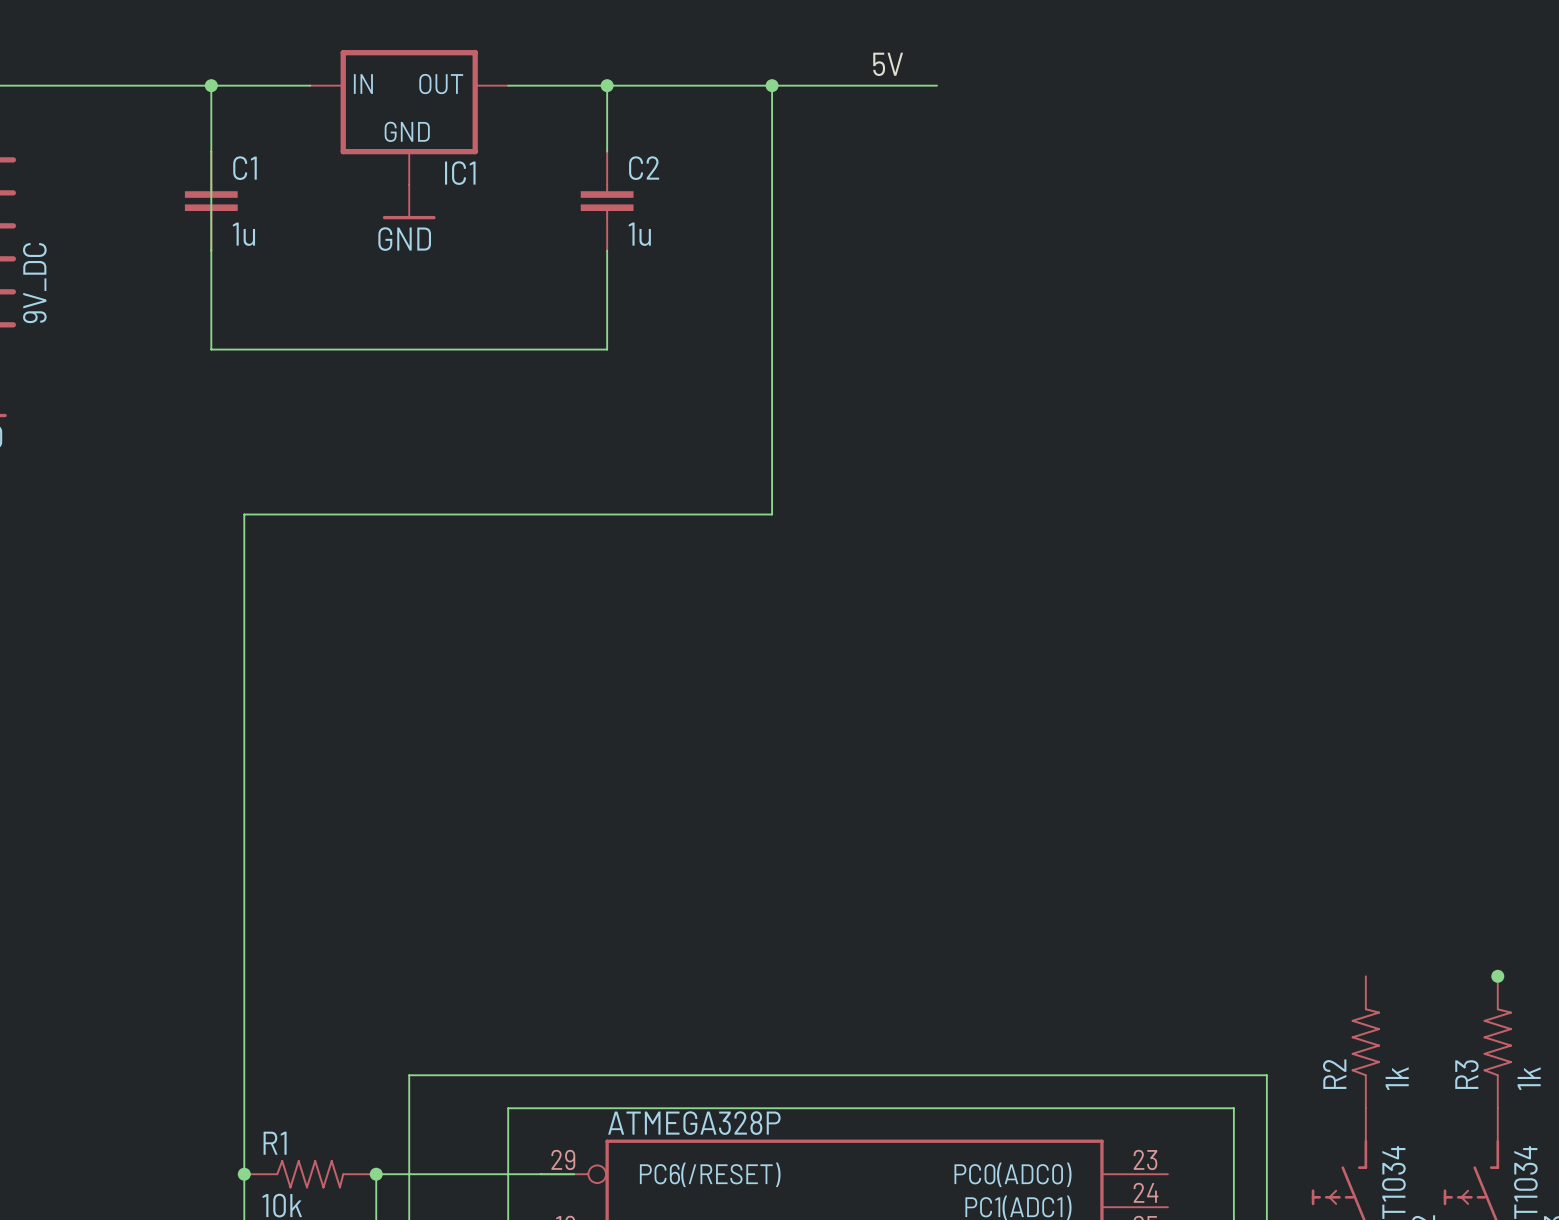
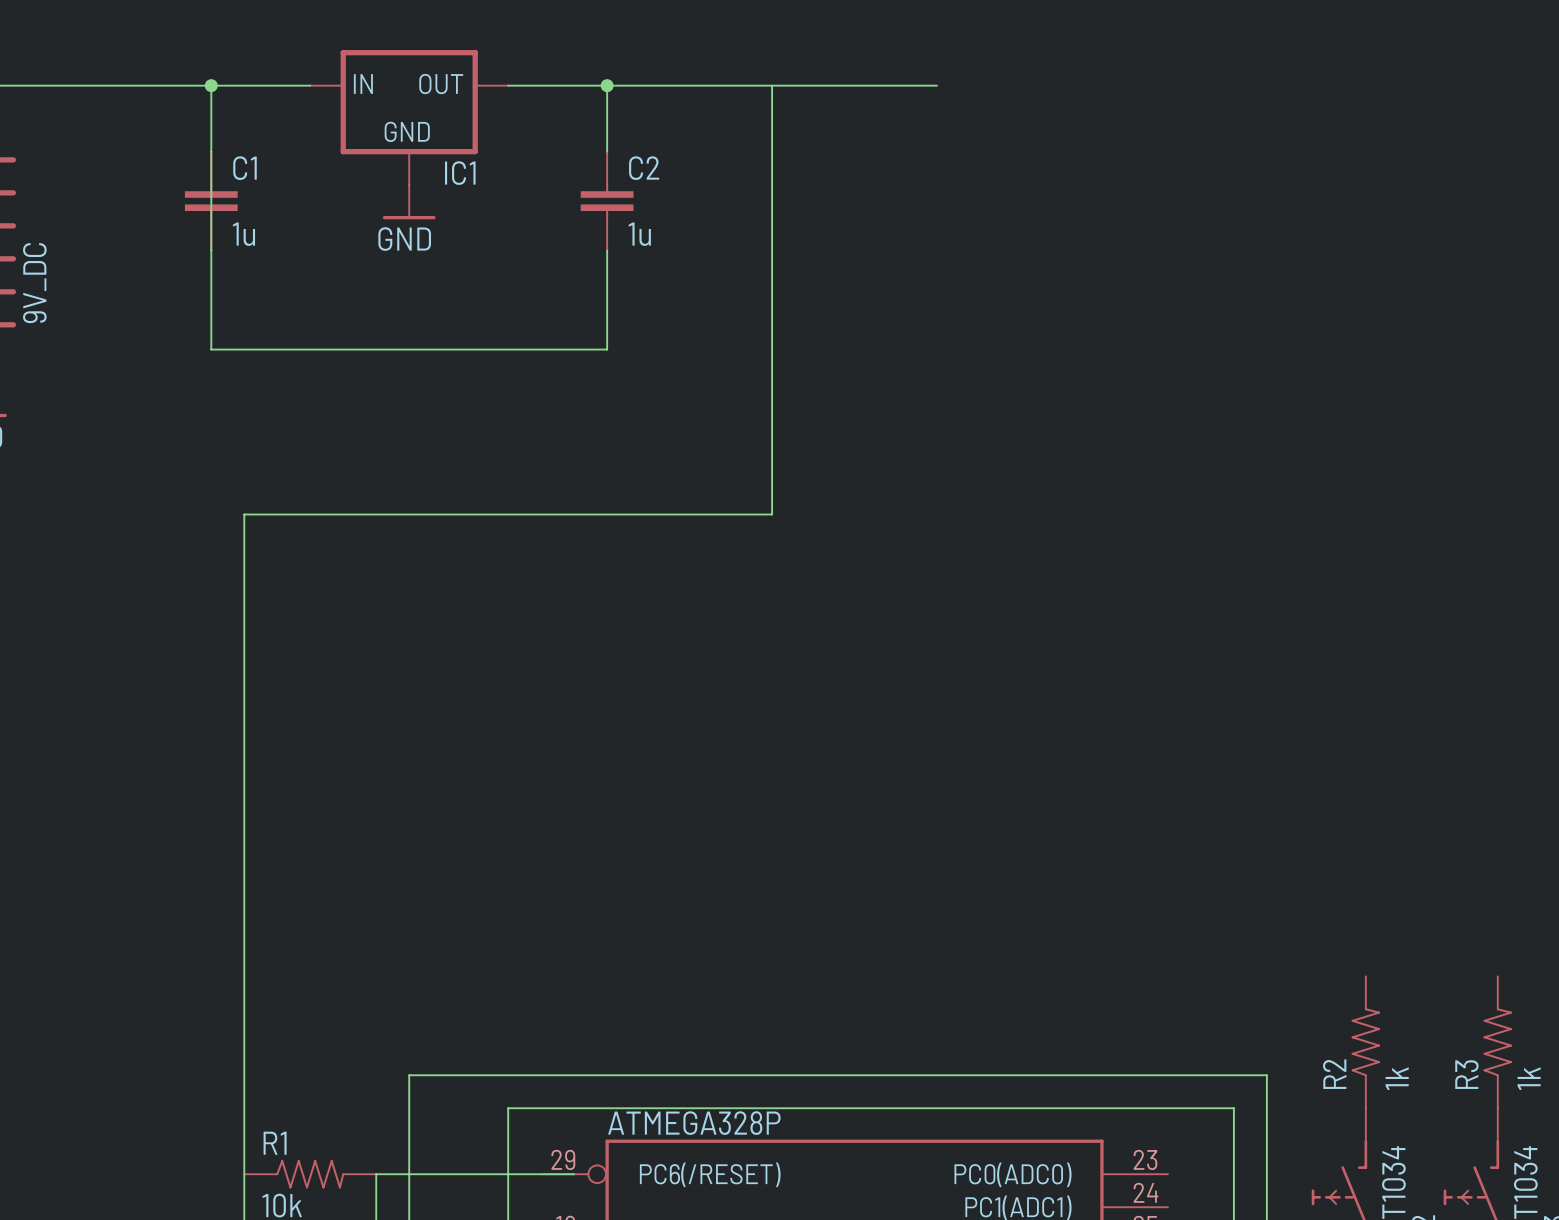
label: 5V (888, 64) -> none
junction: (772, 85) -> none
junction: (1497, 976) -> none
junction: (244, 1174) -> none
junction: (376, 1174) -> none

